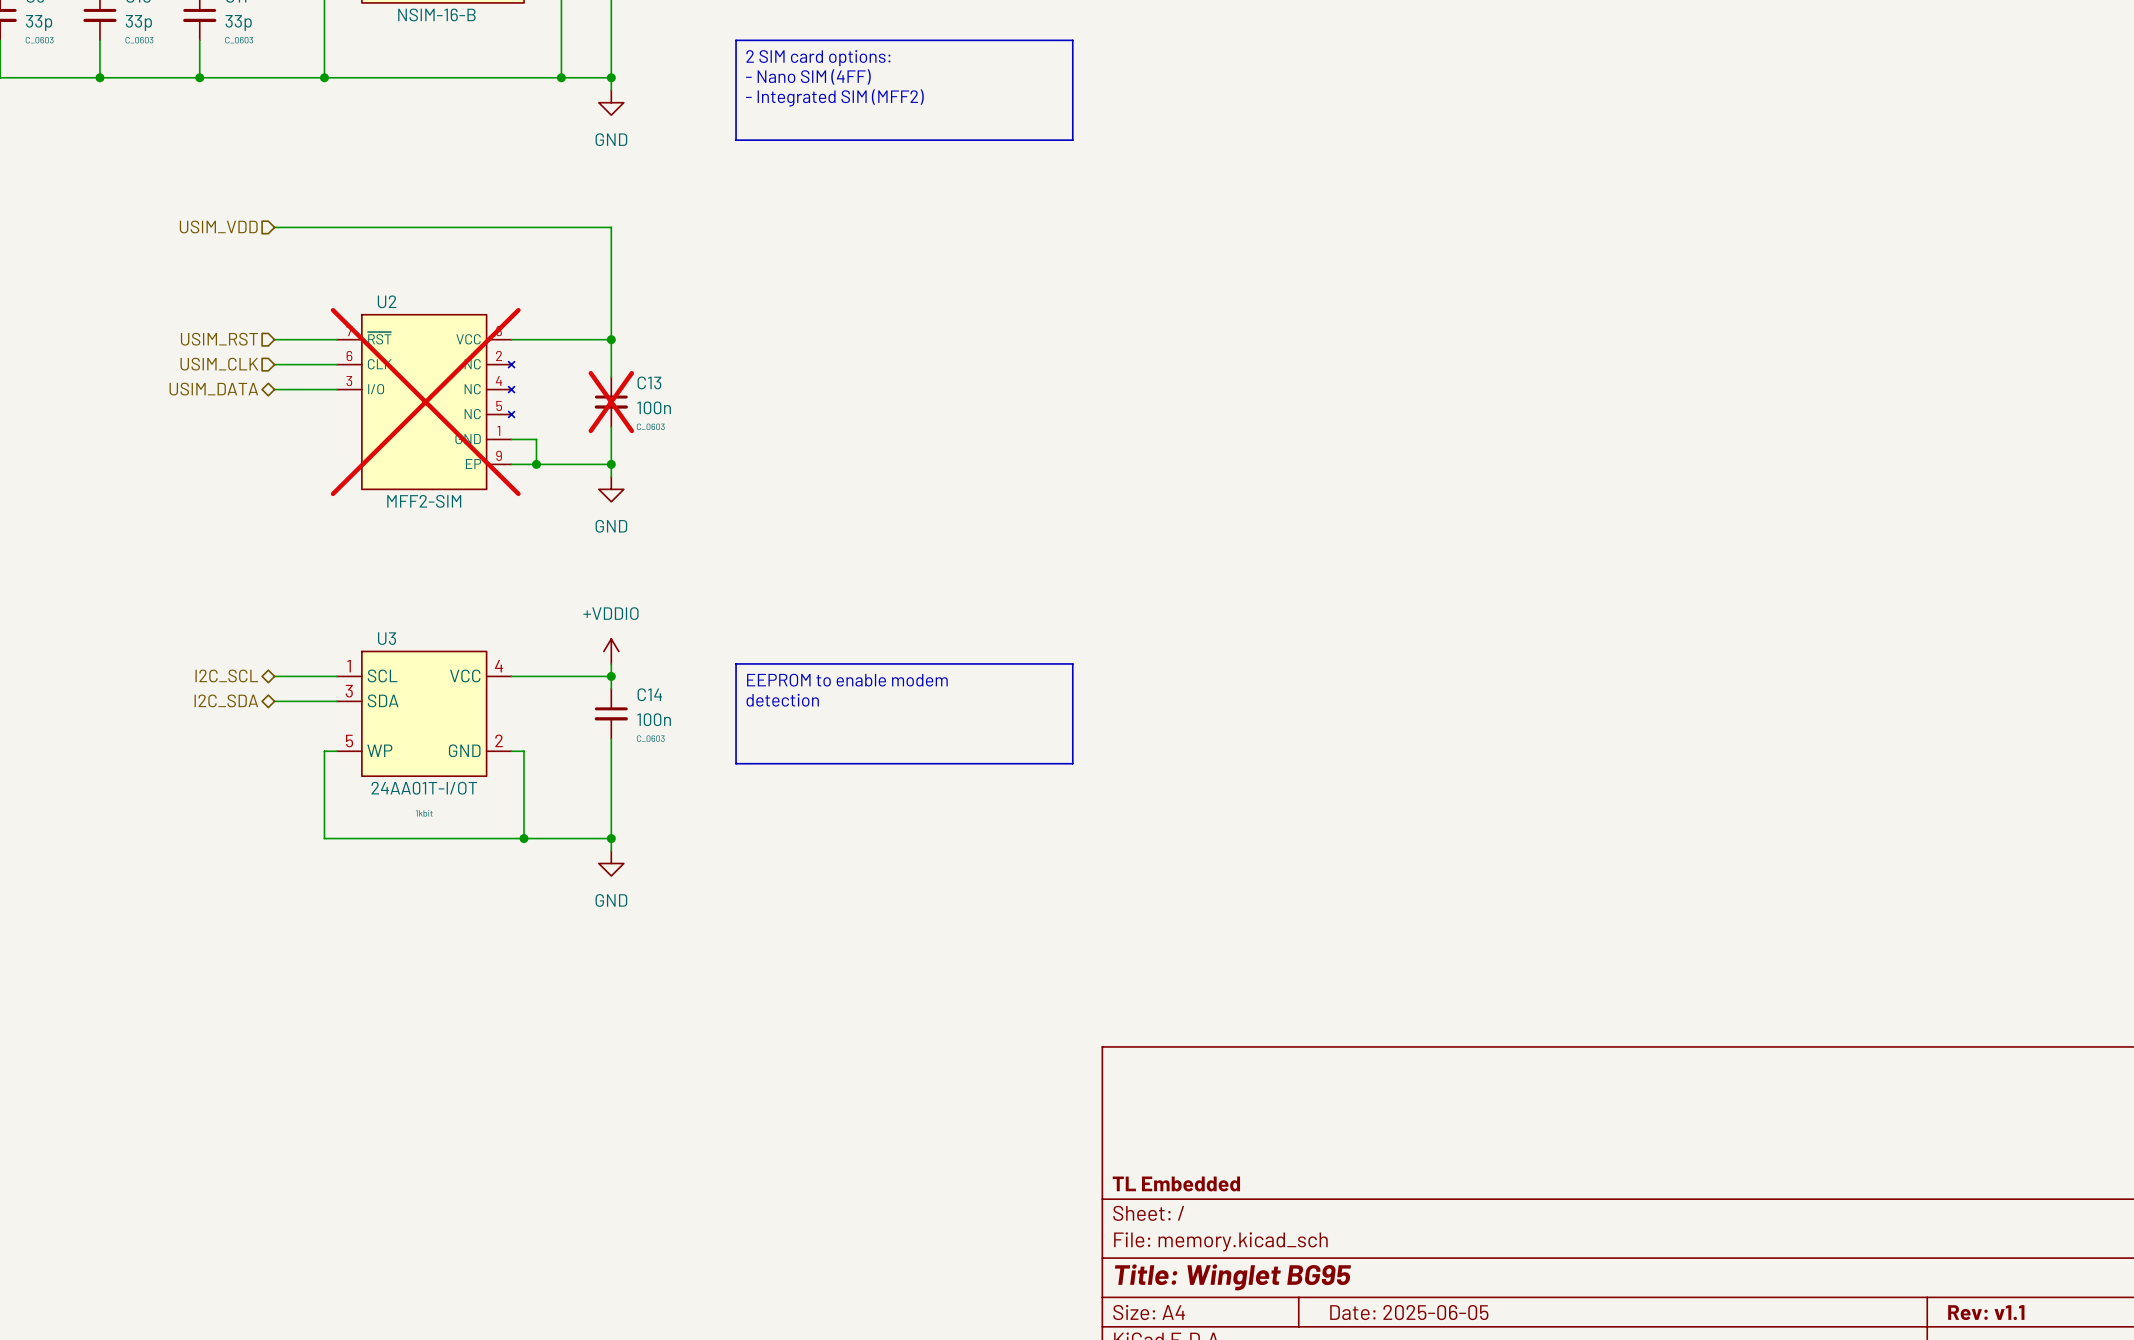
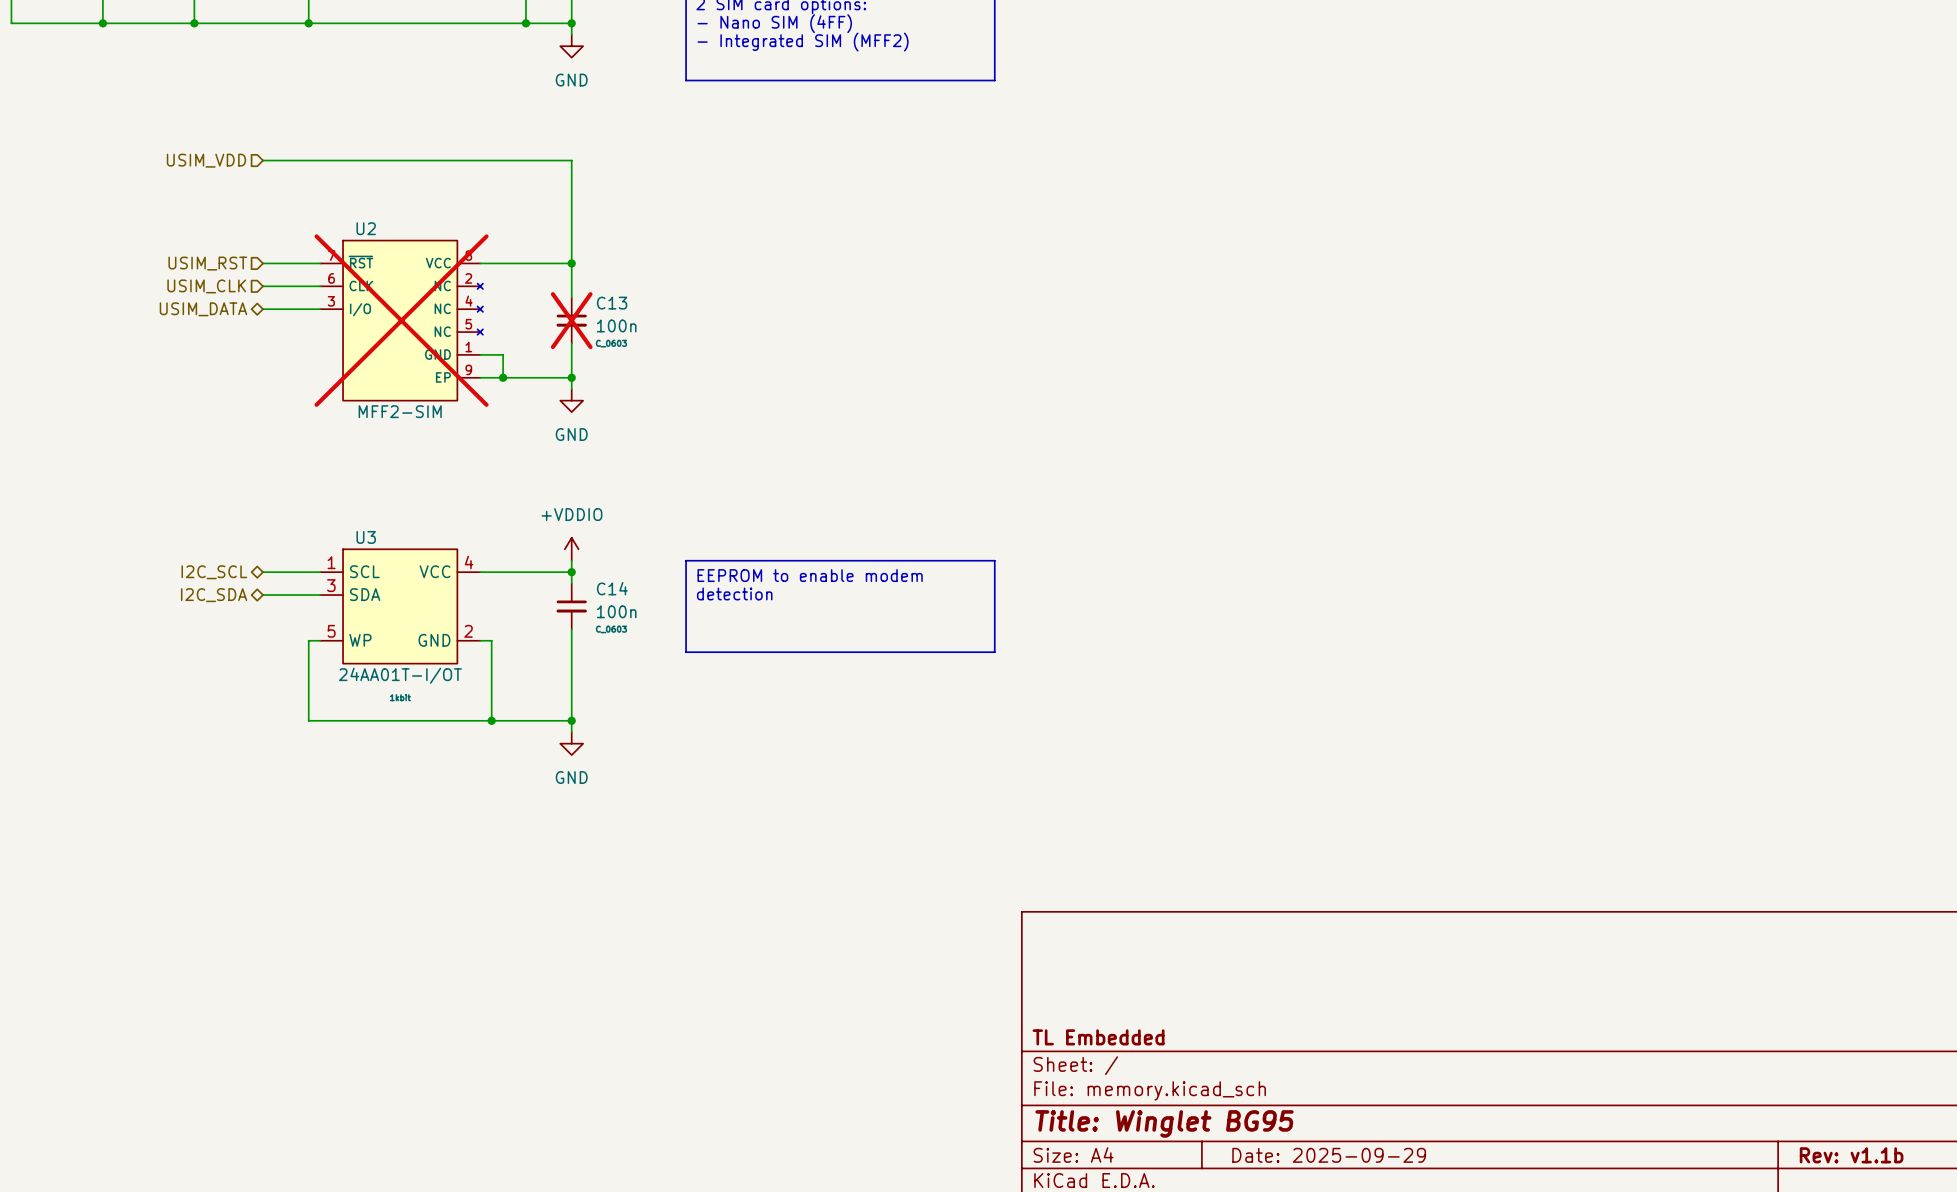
title block: Date: 2025-06-05 (1409, 1312) -> Date: 2025-09-29 (1329, 1155)
title block: Rev: v1.1 (1986, 1312) -> Rev: v1.1b (1851, 1155)

